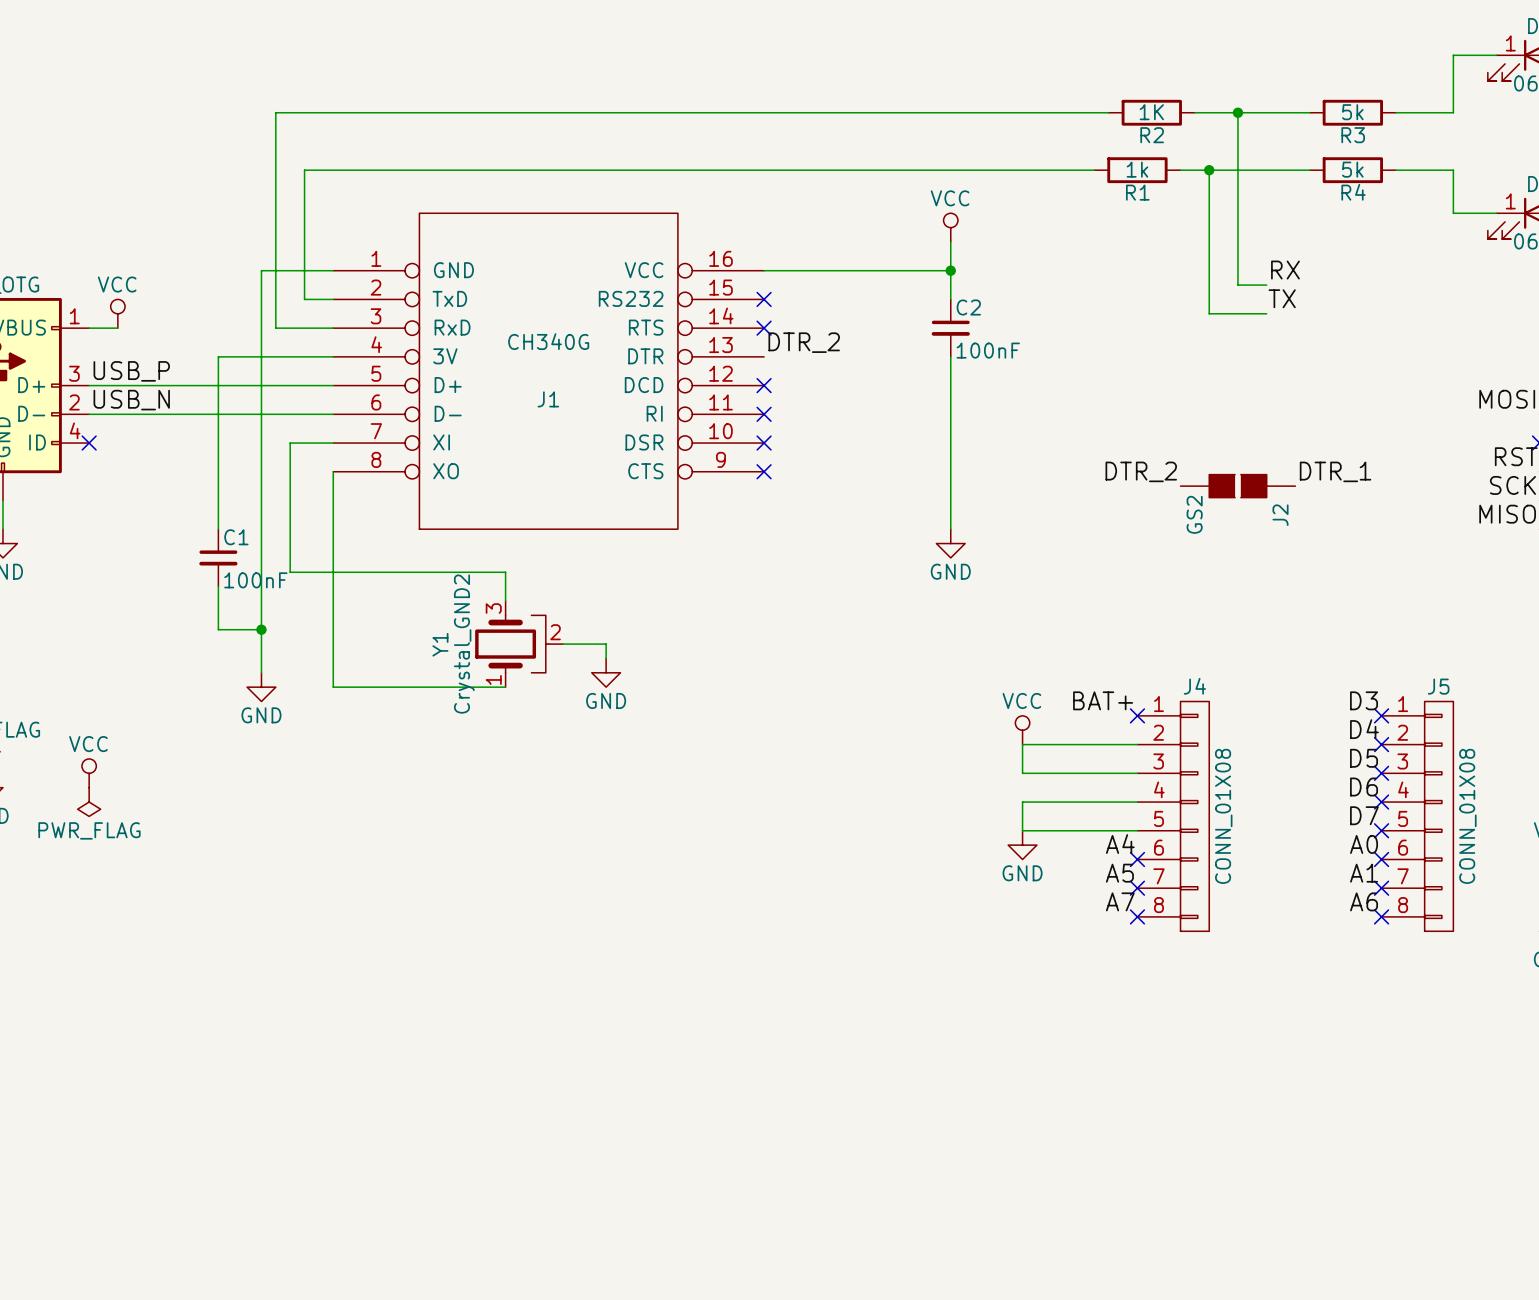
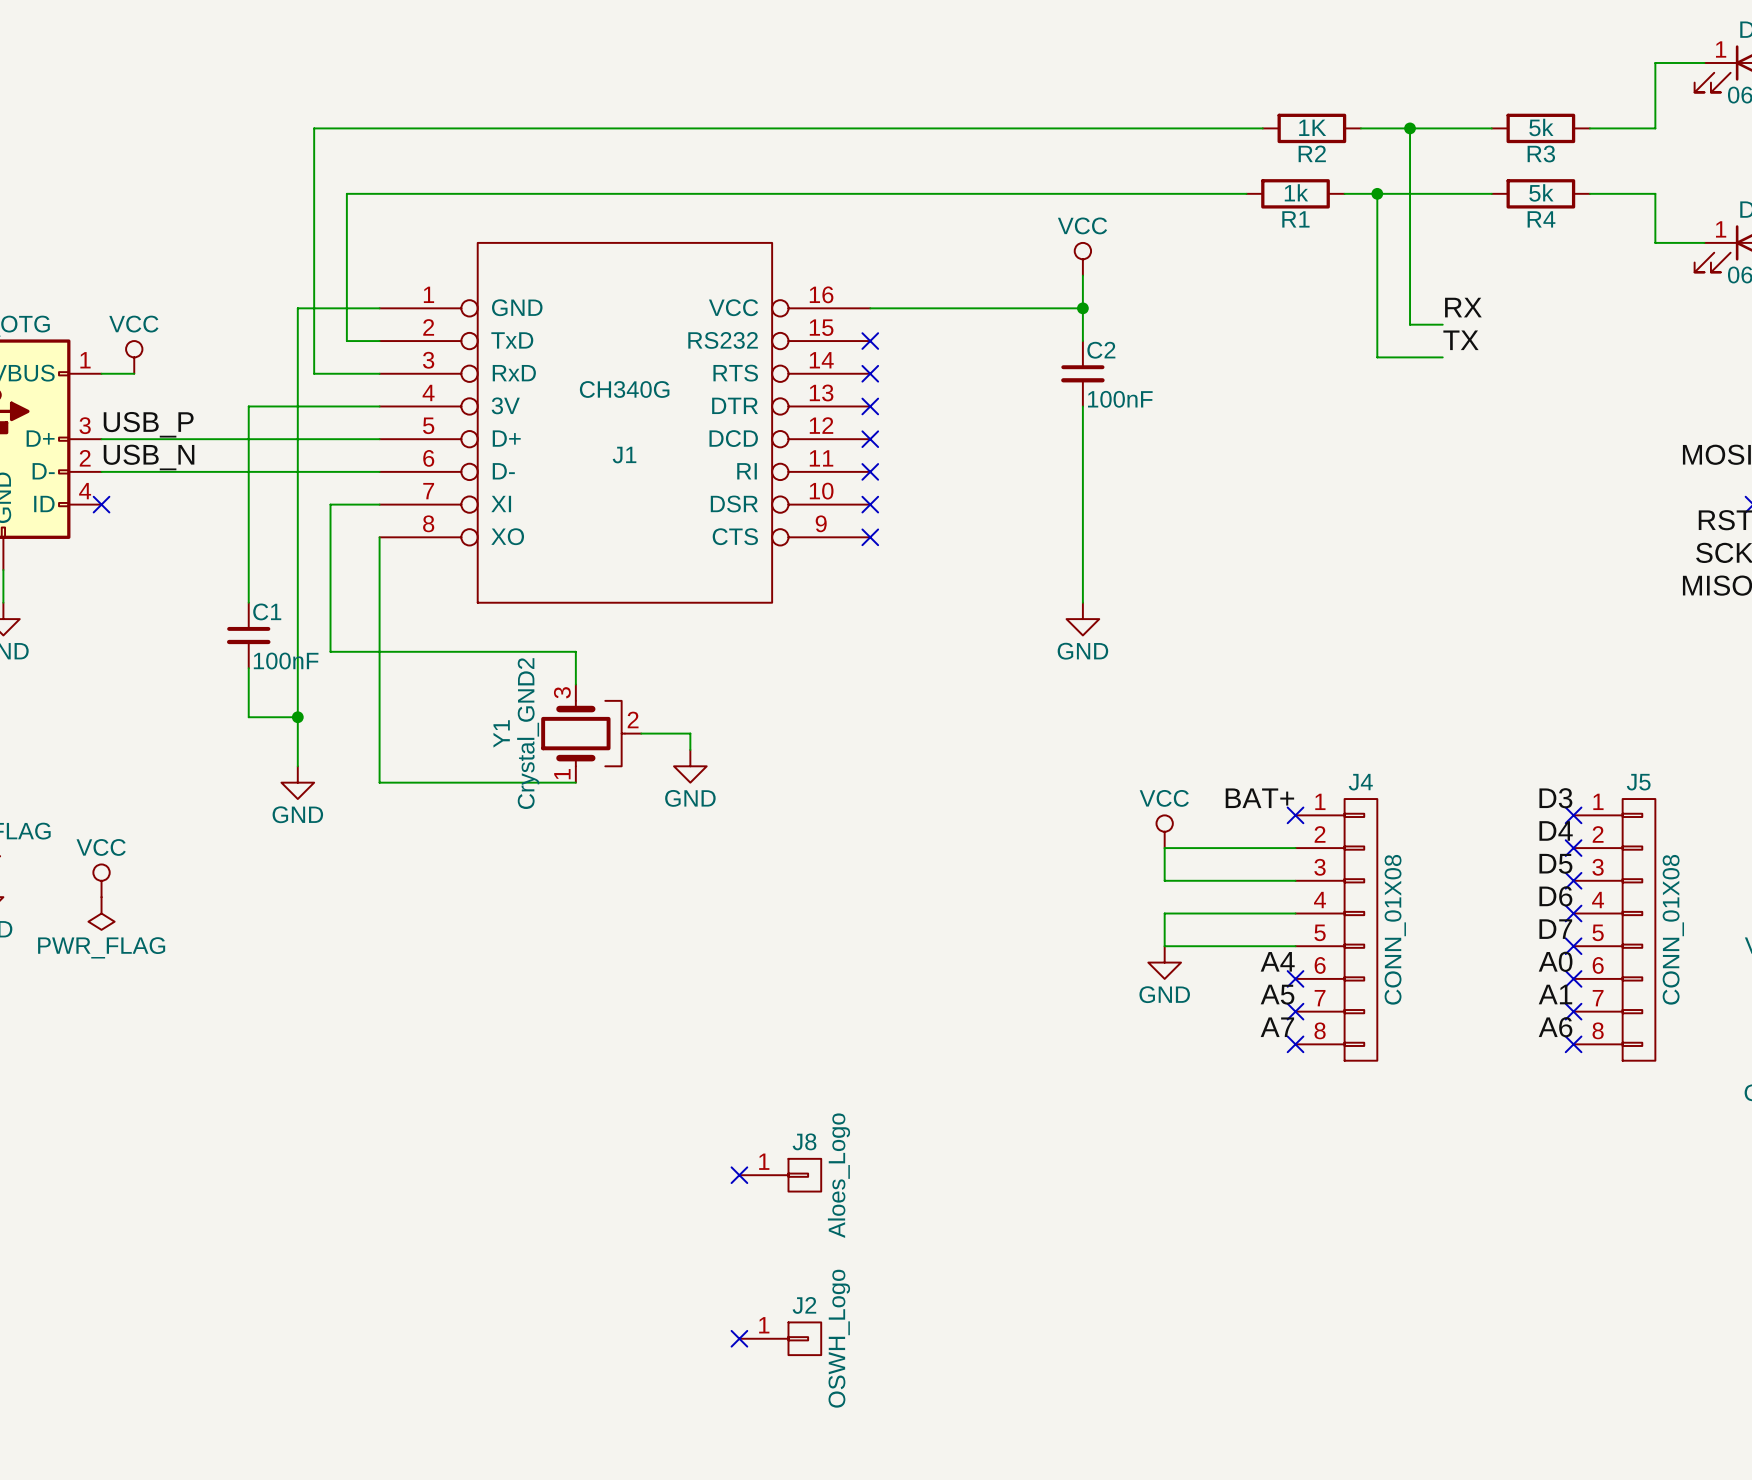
label: DTR_2 (804, 342) -> none
no-connect mark: none -> (870, 406)
label: DTR_2 (1141, 471) -> none
label: DTR_1 (1335, 471) -> none
J2 symbol: [1180, 474, 1296, 498] -> [739, 1322, 822, 1356]
J2 value: GS2 (1194, 514) -> OSWH_Logo (839, 1338)
J2 name position: J2 (1280, 515) -> J2 (804, 1305)
no-connect mark: none -> (739, 1175)
J8: none -> Aloes_Logo (780, 1175)
no-connect mark: none -> (739, 1338)

